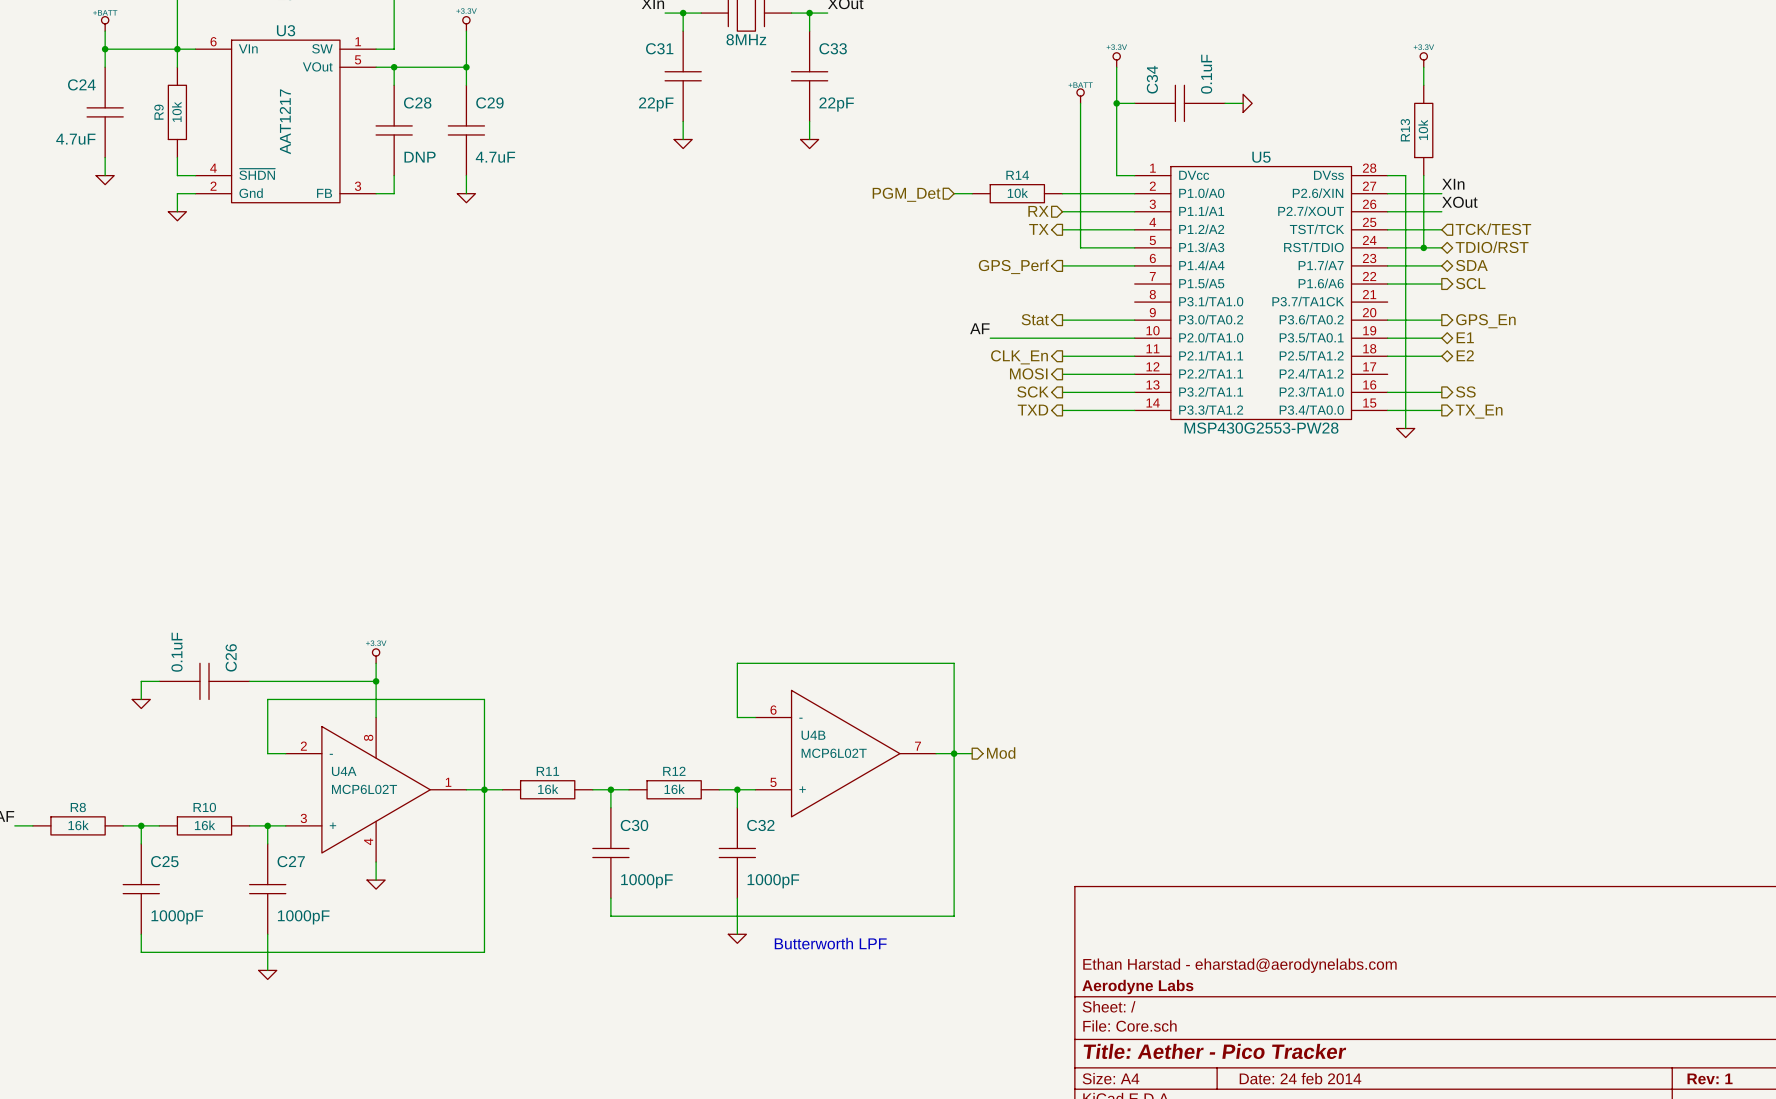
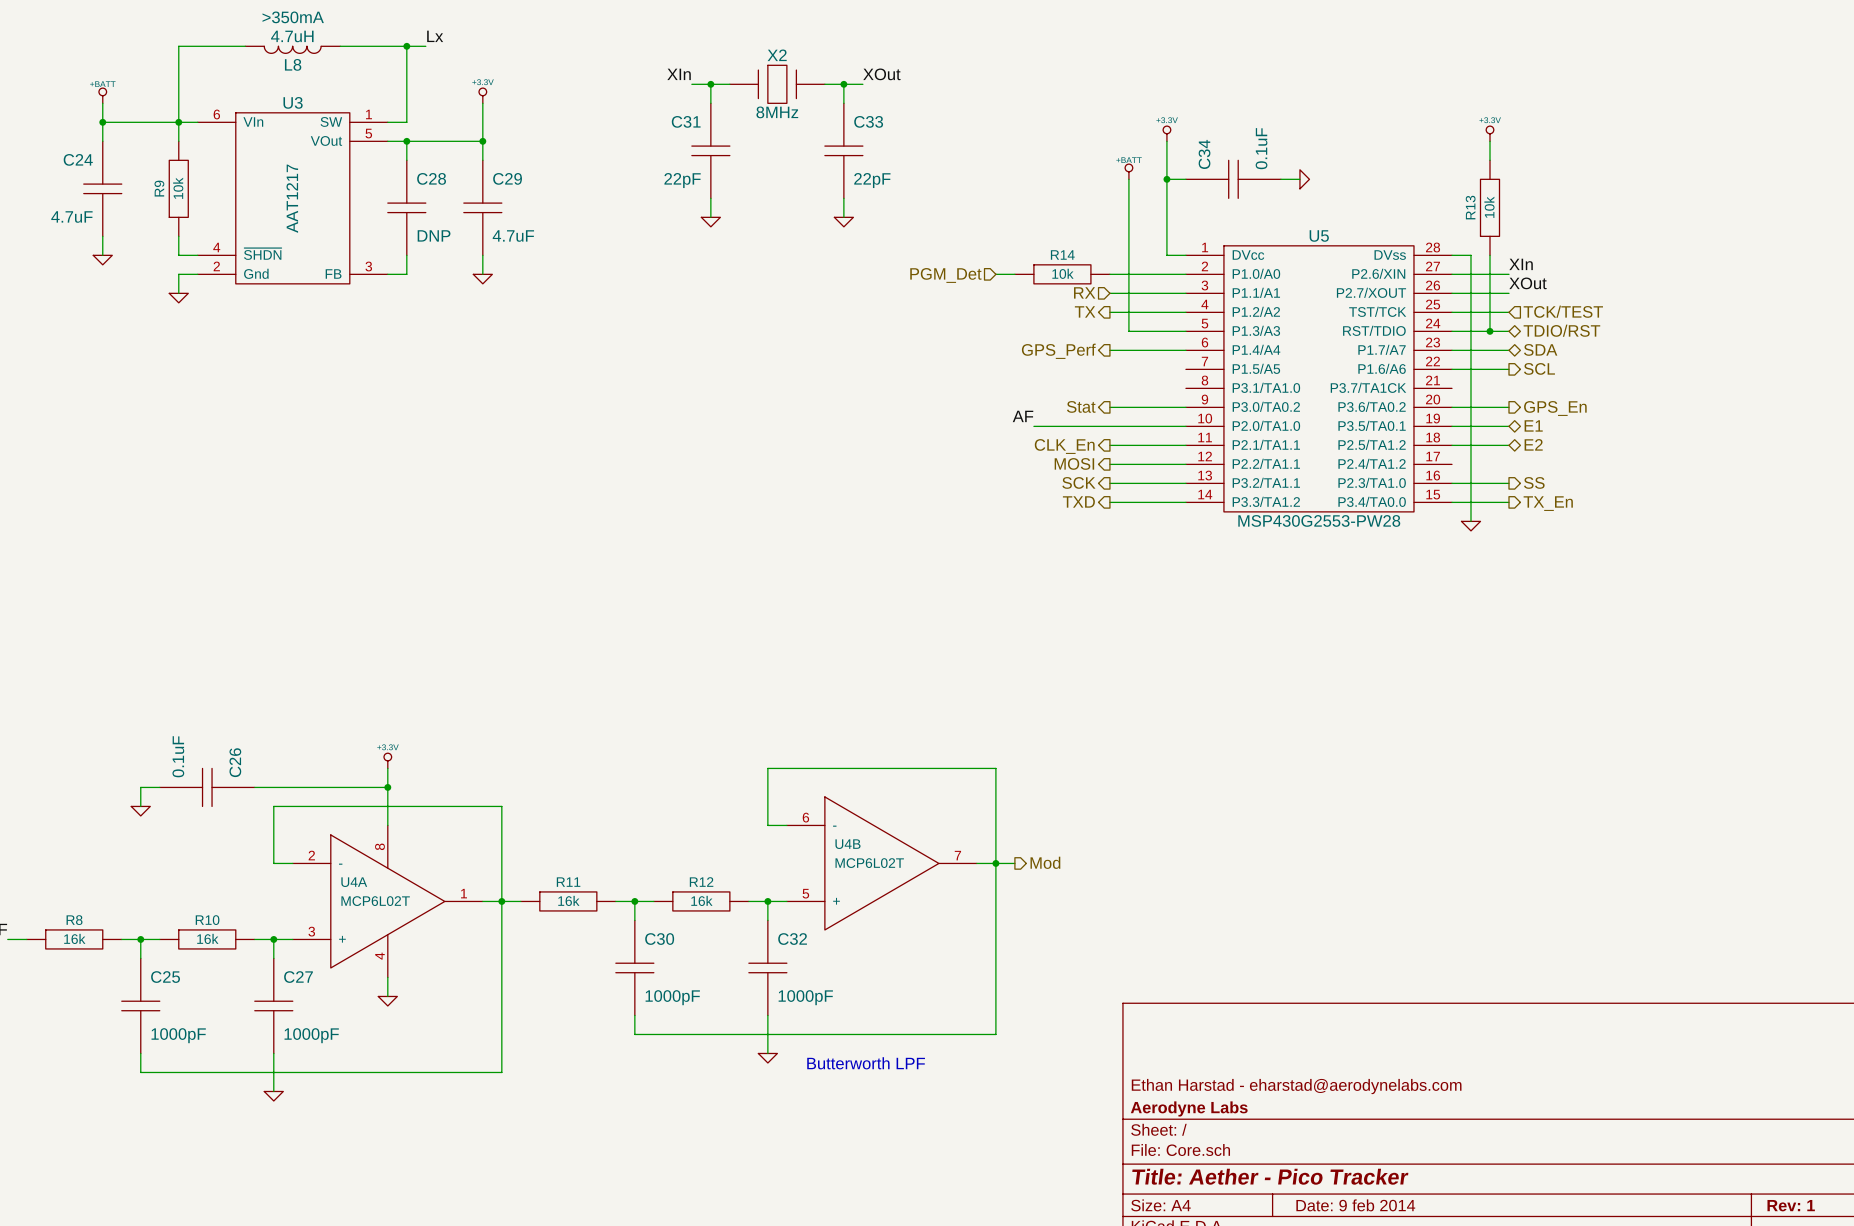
title block: Date: 24 feb 2014 (1300, 1078) -> Date: 9 feb 2014 (1355, 1205)

